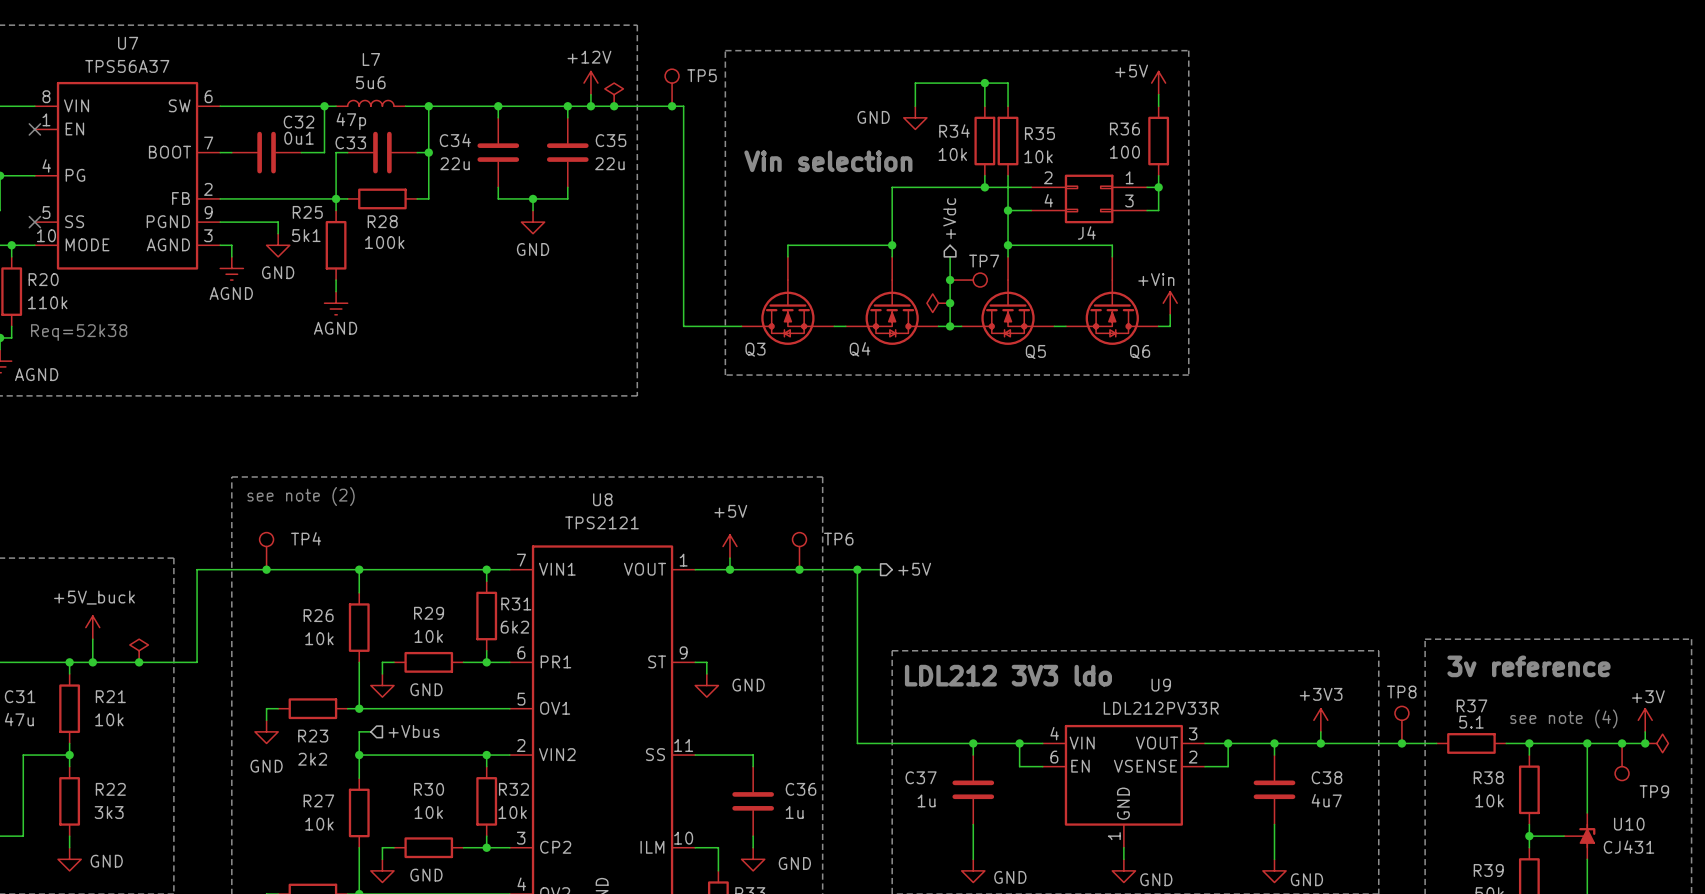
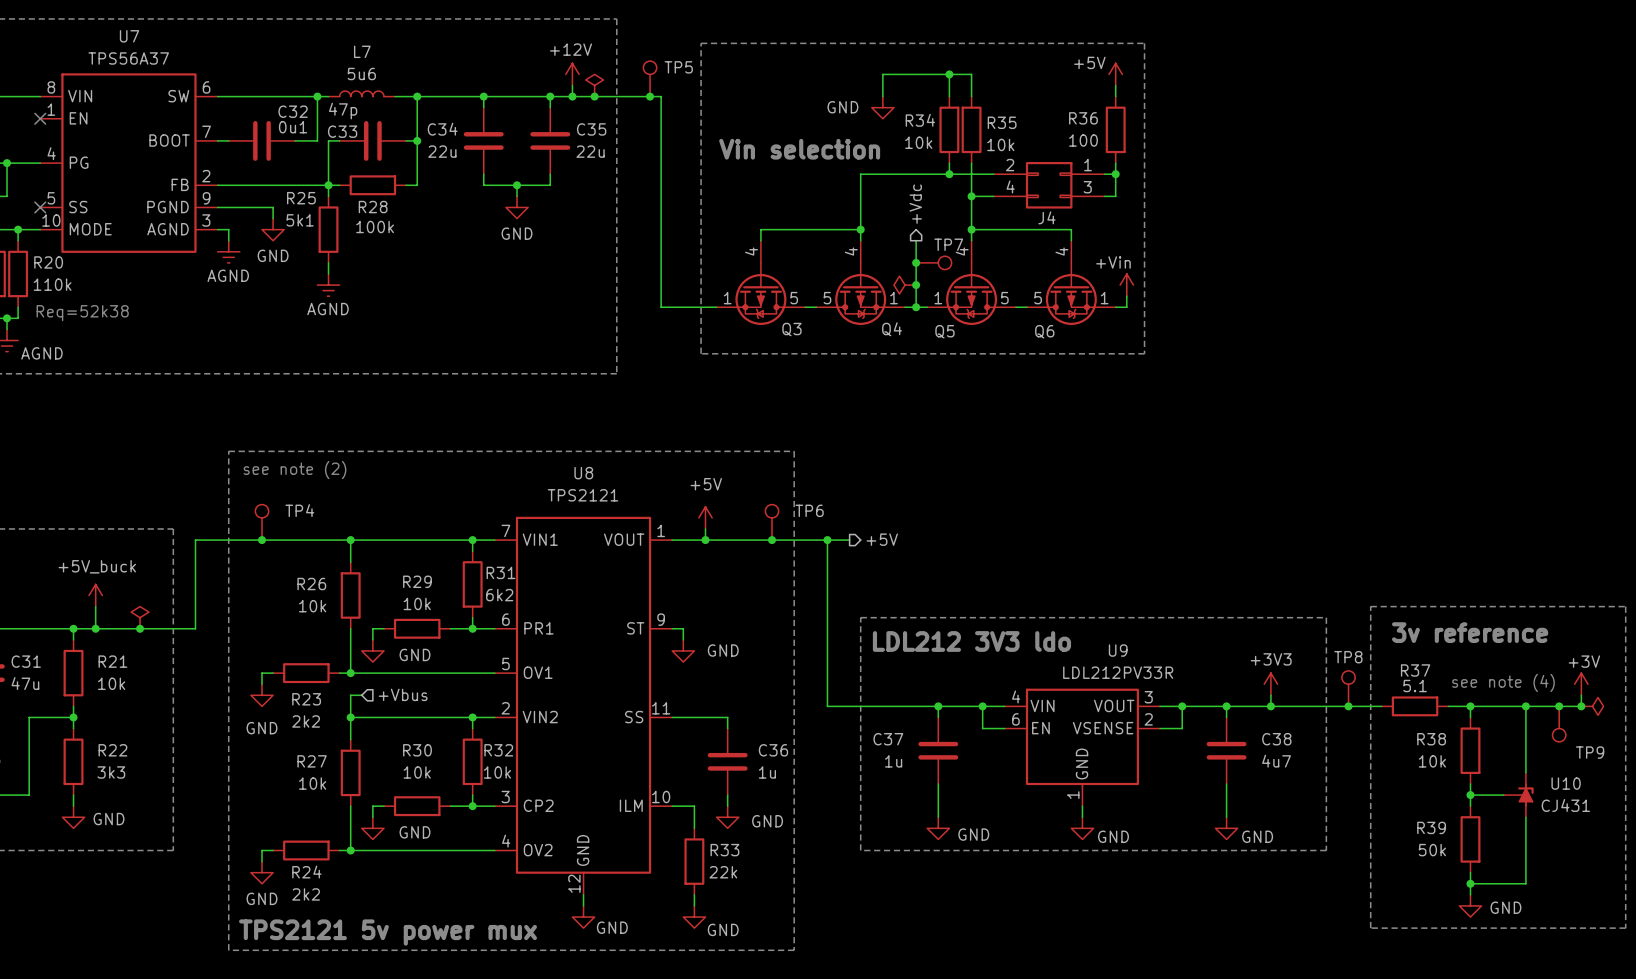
Q3 symbol: [741, 256, 835, 345] -> [716, 240, 806, 325]
Q4 symbol: [845, 256, 939, 345] -> [816, 240, 906, 325]
Q5 symbol: [961, 256, 1055, 345] -> [927, 240, 1016, 325]
Q6 symbol: [1065, 256, 1159, 345] -> [1027, 240, 1116, 325]
Q3 name position: Q3 (755, 349) -> Q3 (791, 329)
Q4 name position: Q4 (860, 349) -> Q4 (892, 329)
Q5 name position: Q5 (1035, 351) -> Q5 (944, 331)
Q6 name position: Q6 (1140, 351) -> Q6 (1044, 331)

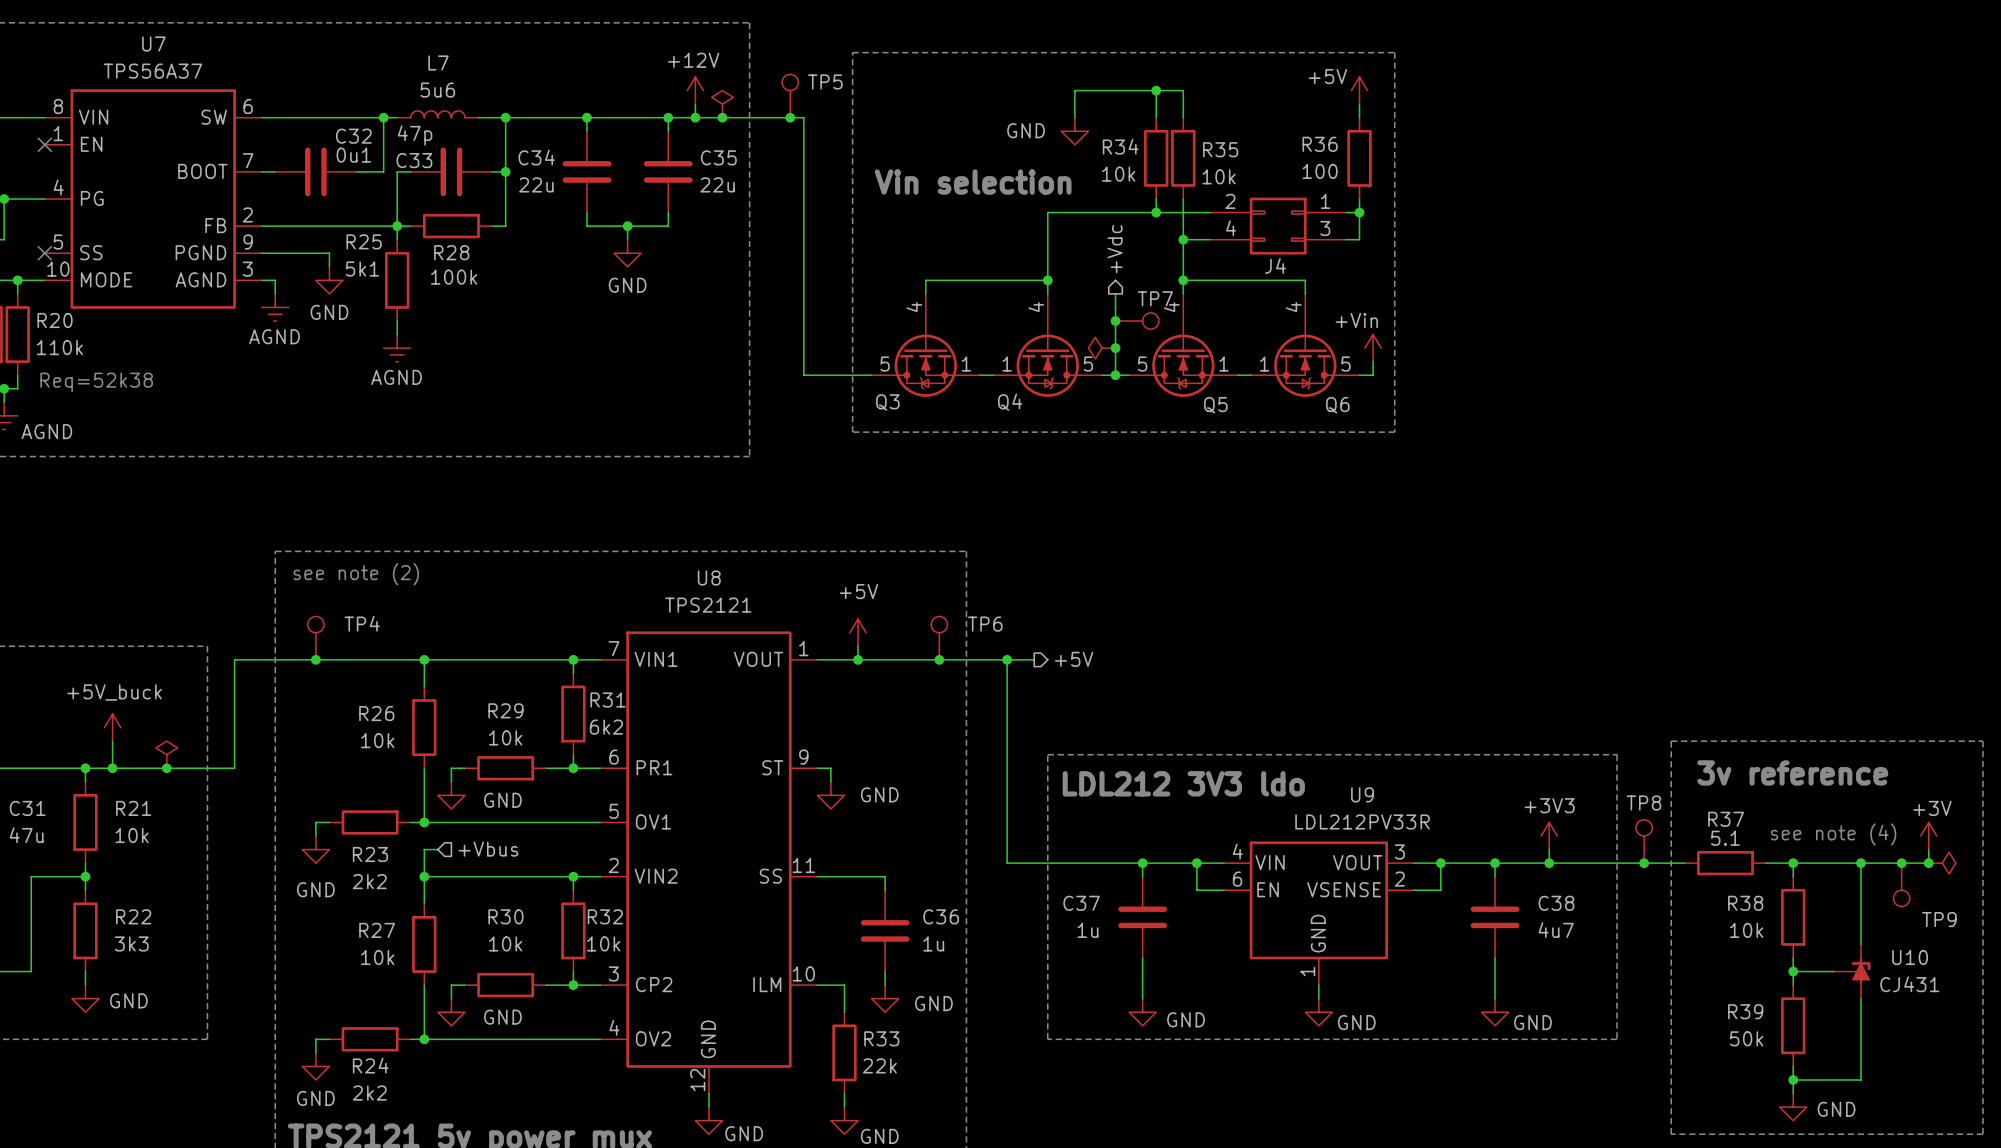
Q3 symbol: [716, 240, 806, 325] -> [871, 293, 981, 397]
Q4 symbol: [816, 240, 906, 325] -> [993, 293, 1102, 397]
Q5 symbol: [927, 240, 1016, 325] -> [1129, 293, 1238, 397]
Q6 symbol: [1027, 240, 1116, 325] -> [1251, 293, 1360, 397]
Q3 name position: Q3 (791, 329) -> Q3 (887, 402)
Q4 name position: Q4 (892, 329) -> Q4 (1010, 402)
Q5 name position: Q5 (944, 331) -> Q5 (1215, 405)
Q6 name position: Q6 (1044, 331) -> Q6 (1337, 405)

